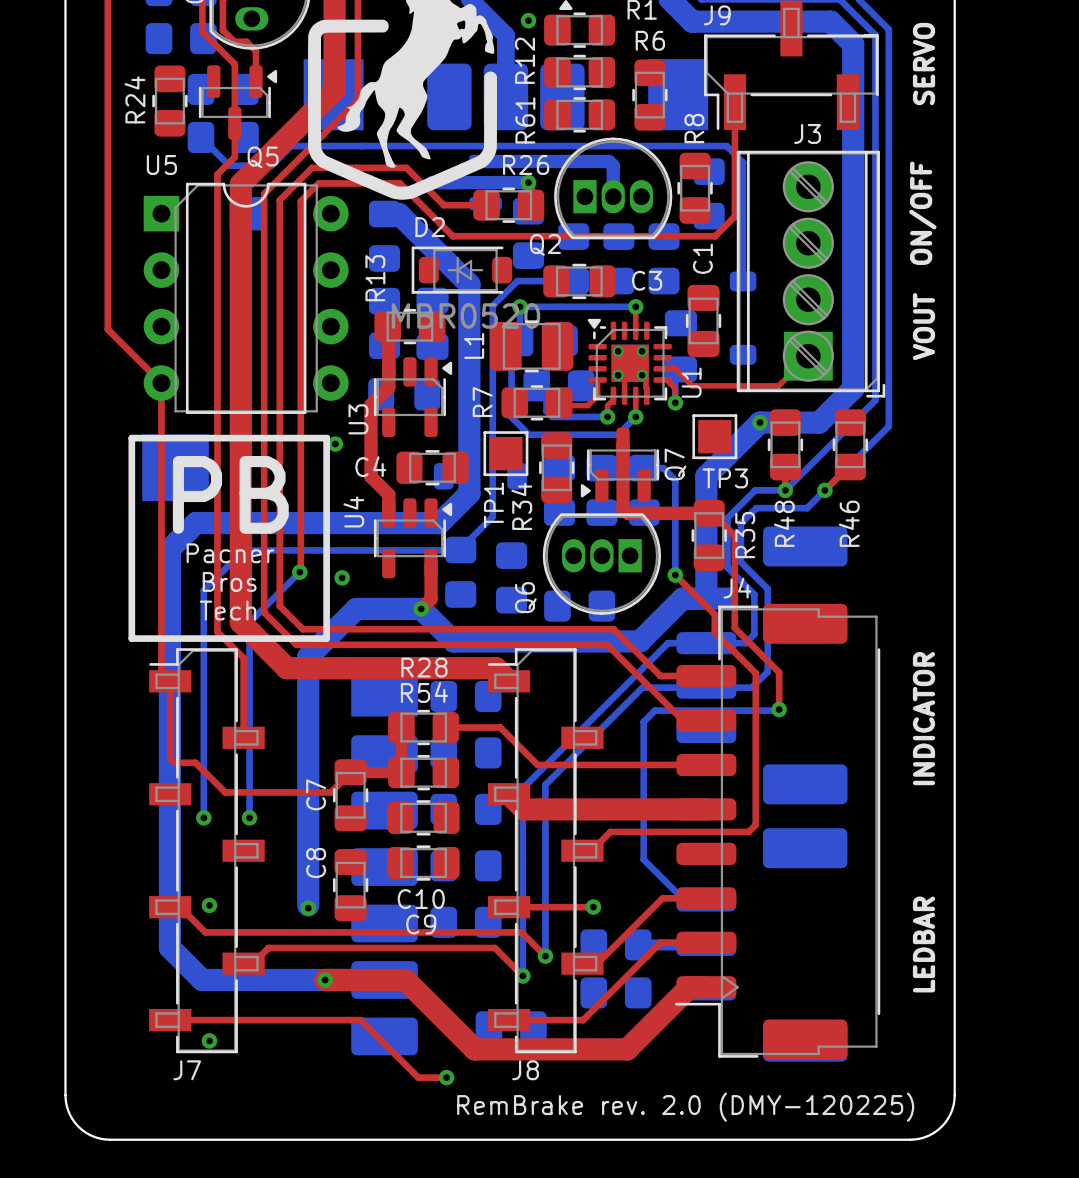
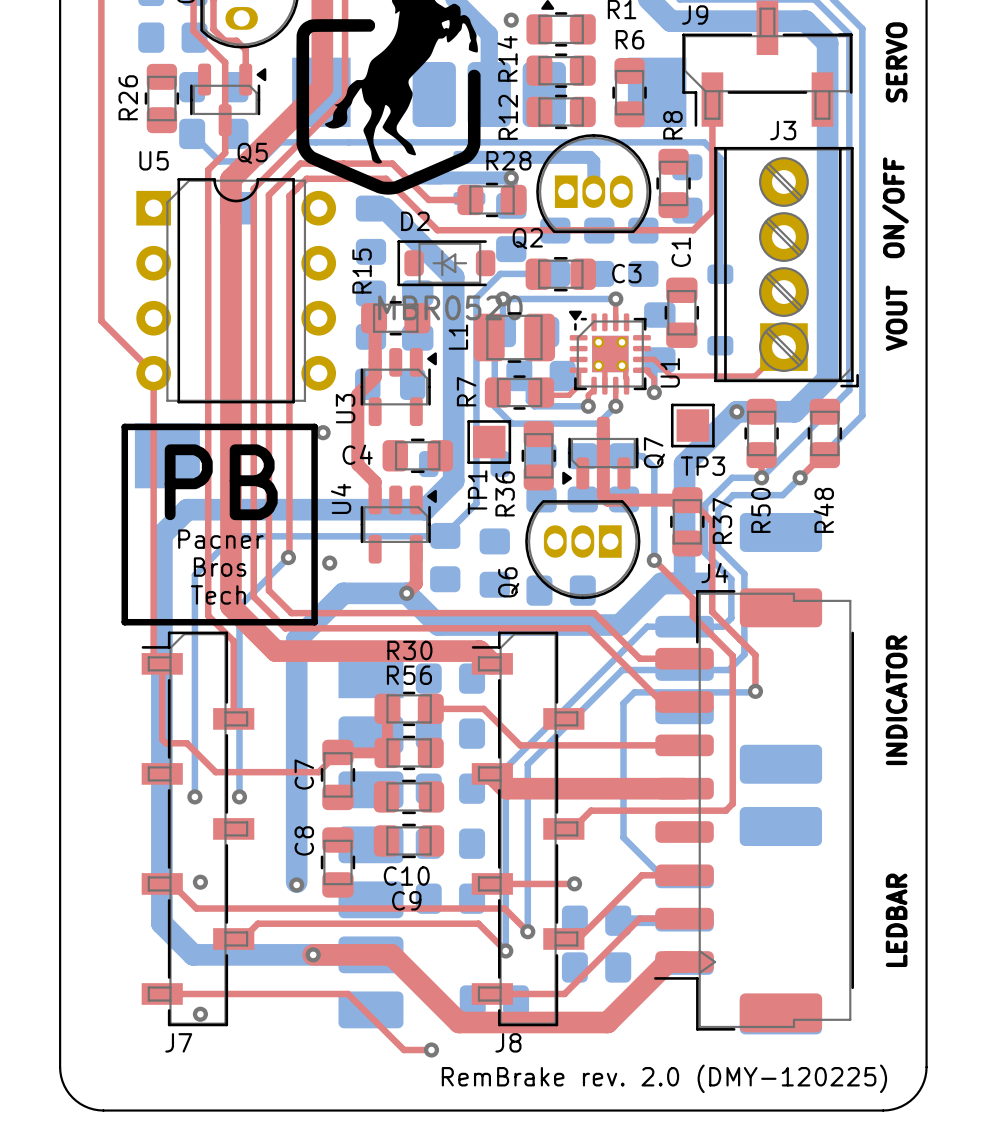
R12 name: R12 (525, 60) -> R14 (507, 58)
R24 name: R24 (134, 99) -> R26 (128, 97)
R61 name: R61 (525, 120) -> R12 (508, 117)
R26 name: R26 (526, 165) -> R28 (508, 160)
R13 name: R13 (375, 278) -> R15 (362, 271)
R34 name: R34 (521, 506) -> R36 (505, 493)
R48 name: R48 (784, 523) -> R50 (760, 510)
R46 name: R46 (849, 523) -> R48 (823, 510)
R35 name: R35 (745, 535) -> R37 (722, 520)
R28 name: R28 (424, 667) -> R30 (409, 650)
R54 name: R54 (424, 692) -> R56 (409, 675)

